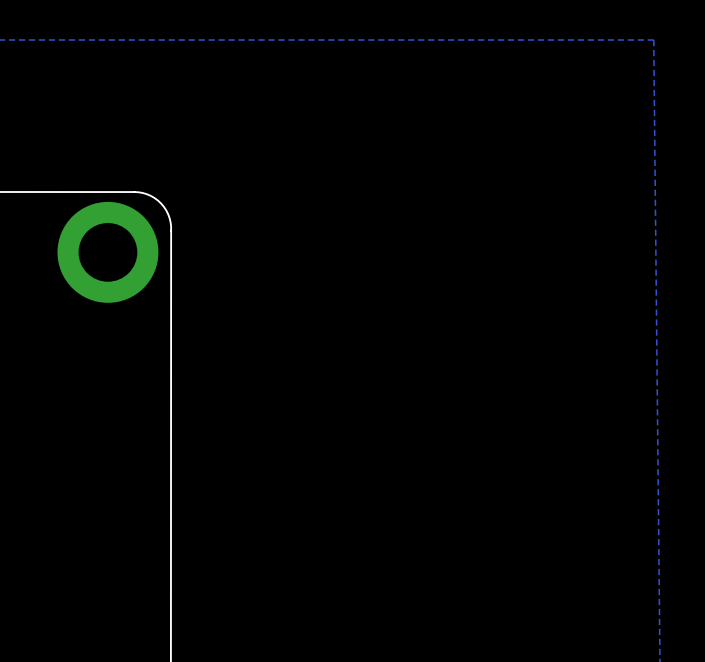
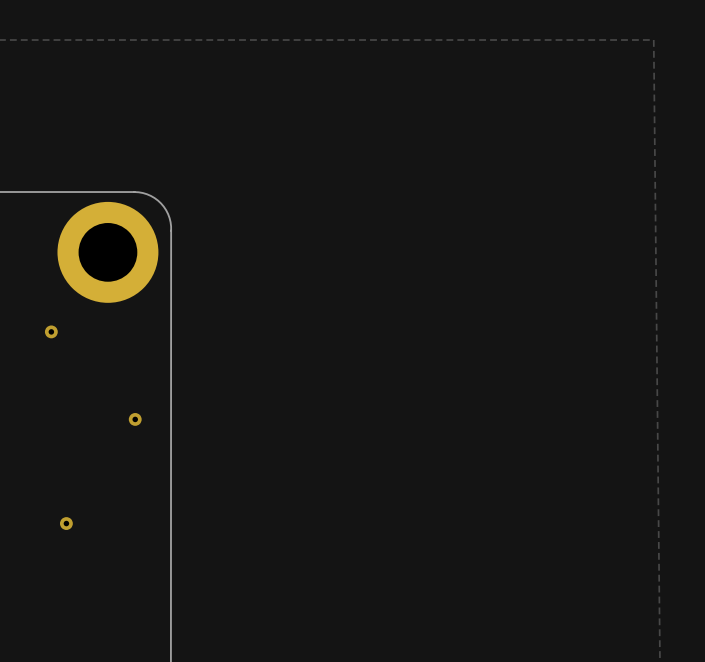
via: none -> (51, 331)
via: none -> (135, 419)
via: none -> (66, 523)

